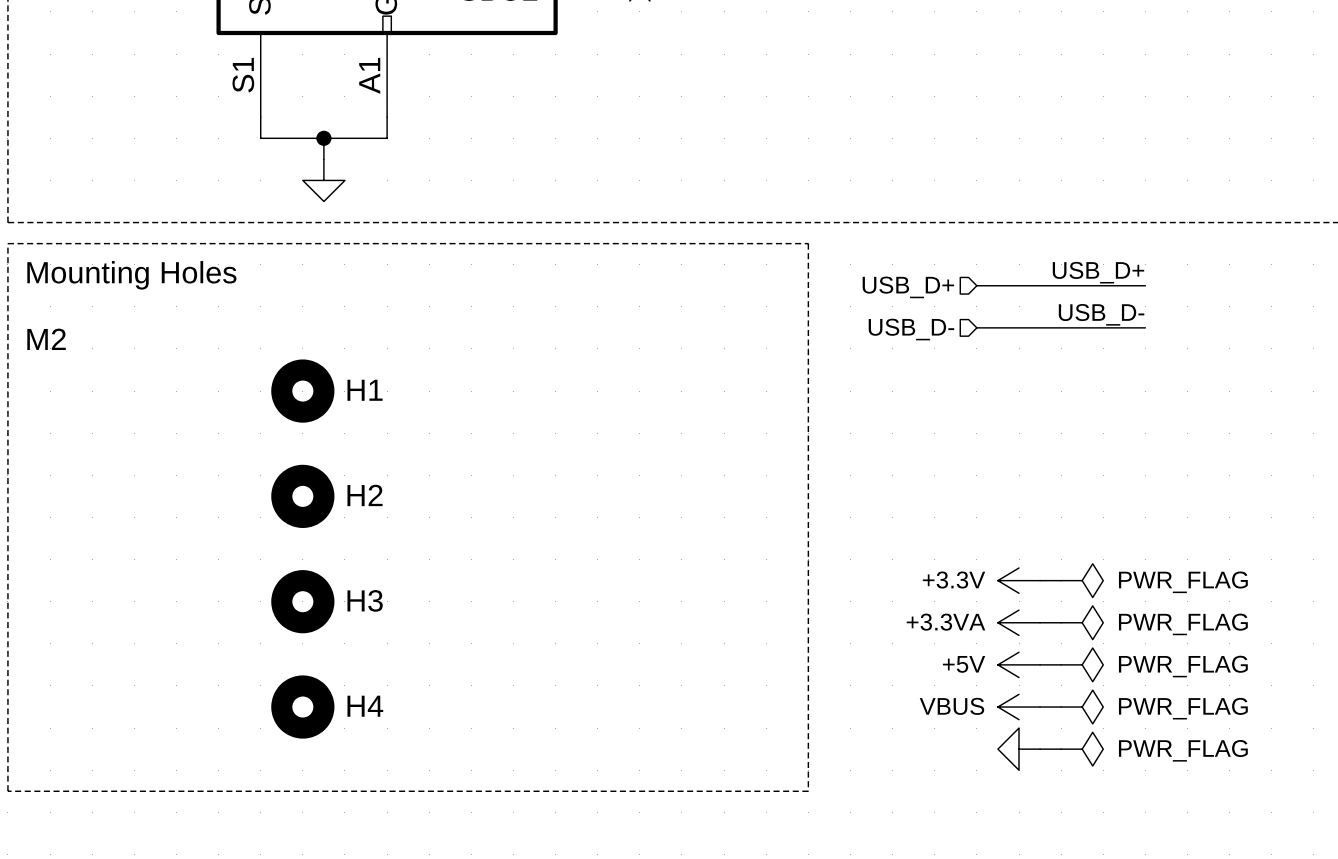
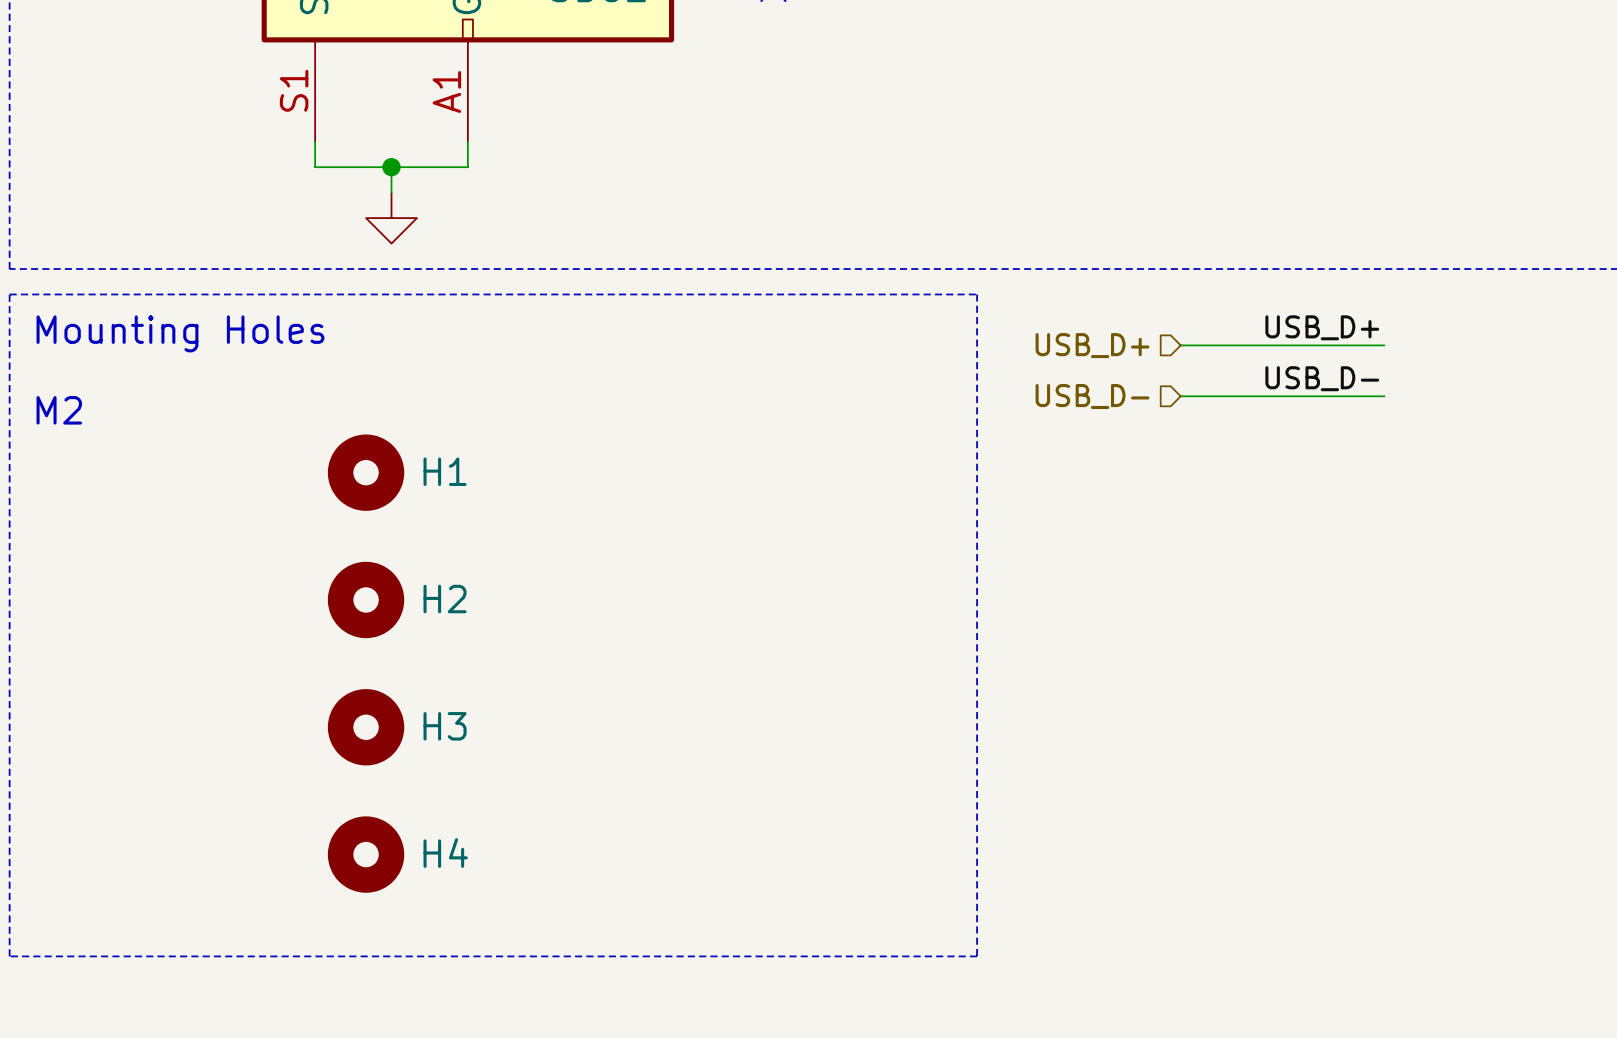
power symbol: +3.3V (1019, 580) -> none
wire: (1040, 580) (1061, 580) -> none
power symbol: PWR_FLAG (1082, 580) -> none
power symbol: +3.3VA (1019, 622) -> none
wire: (1040, 622) (1061, 622) -> none
power symbol: PWR_FLAG (1082, 622) -> none
power symbol: +5V (1019, 664) -> none
wire: (1040, 664) (1061, 664) -> none
power symbol: PWR_FLAG (1082, 664) -> none
power symbol: VBUS (1019, 707) -> none
wire: (1040, 707) (1061, 707) -> none
power symbol: PWR_FLAG (1082, 707) -> none
power symbol: (1019, 749) -> none
wire: (1040, 749) (1061, 749) -> none
power symbol: PWR_FLAG (1082, 749) -> none

